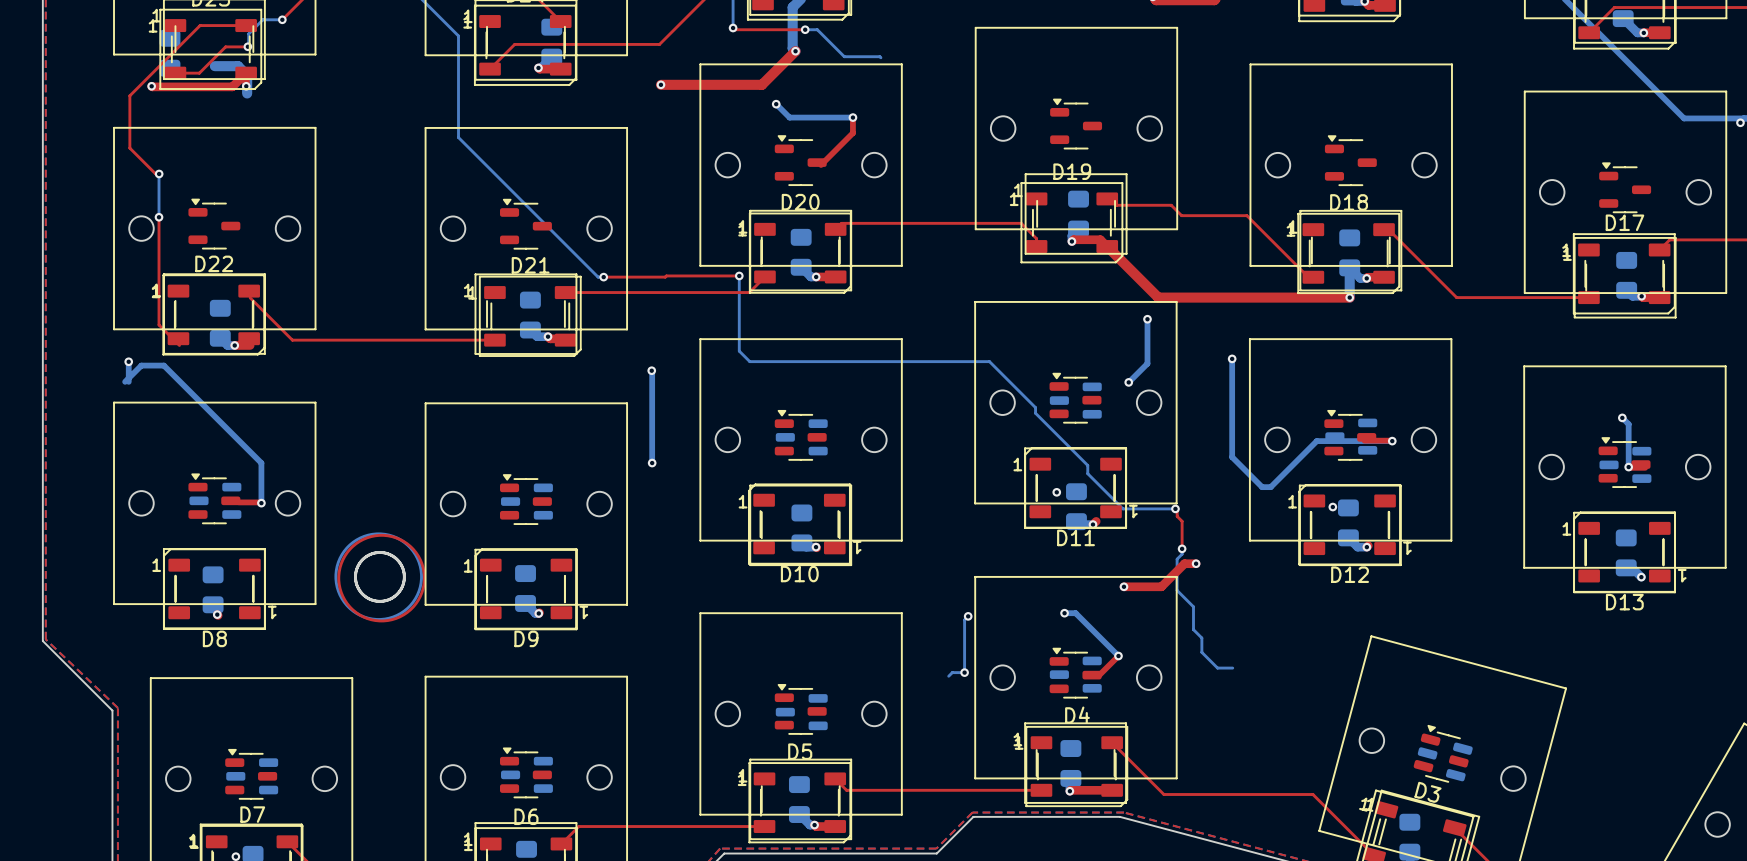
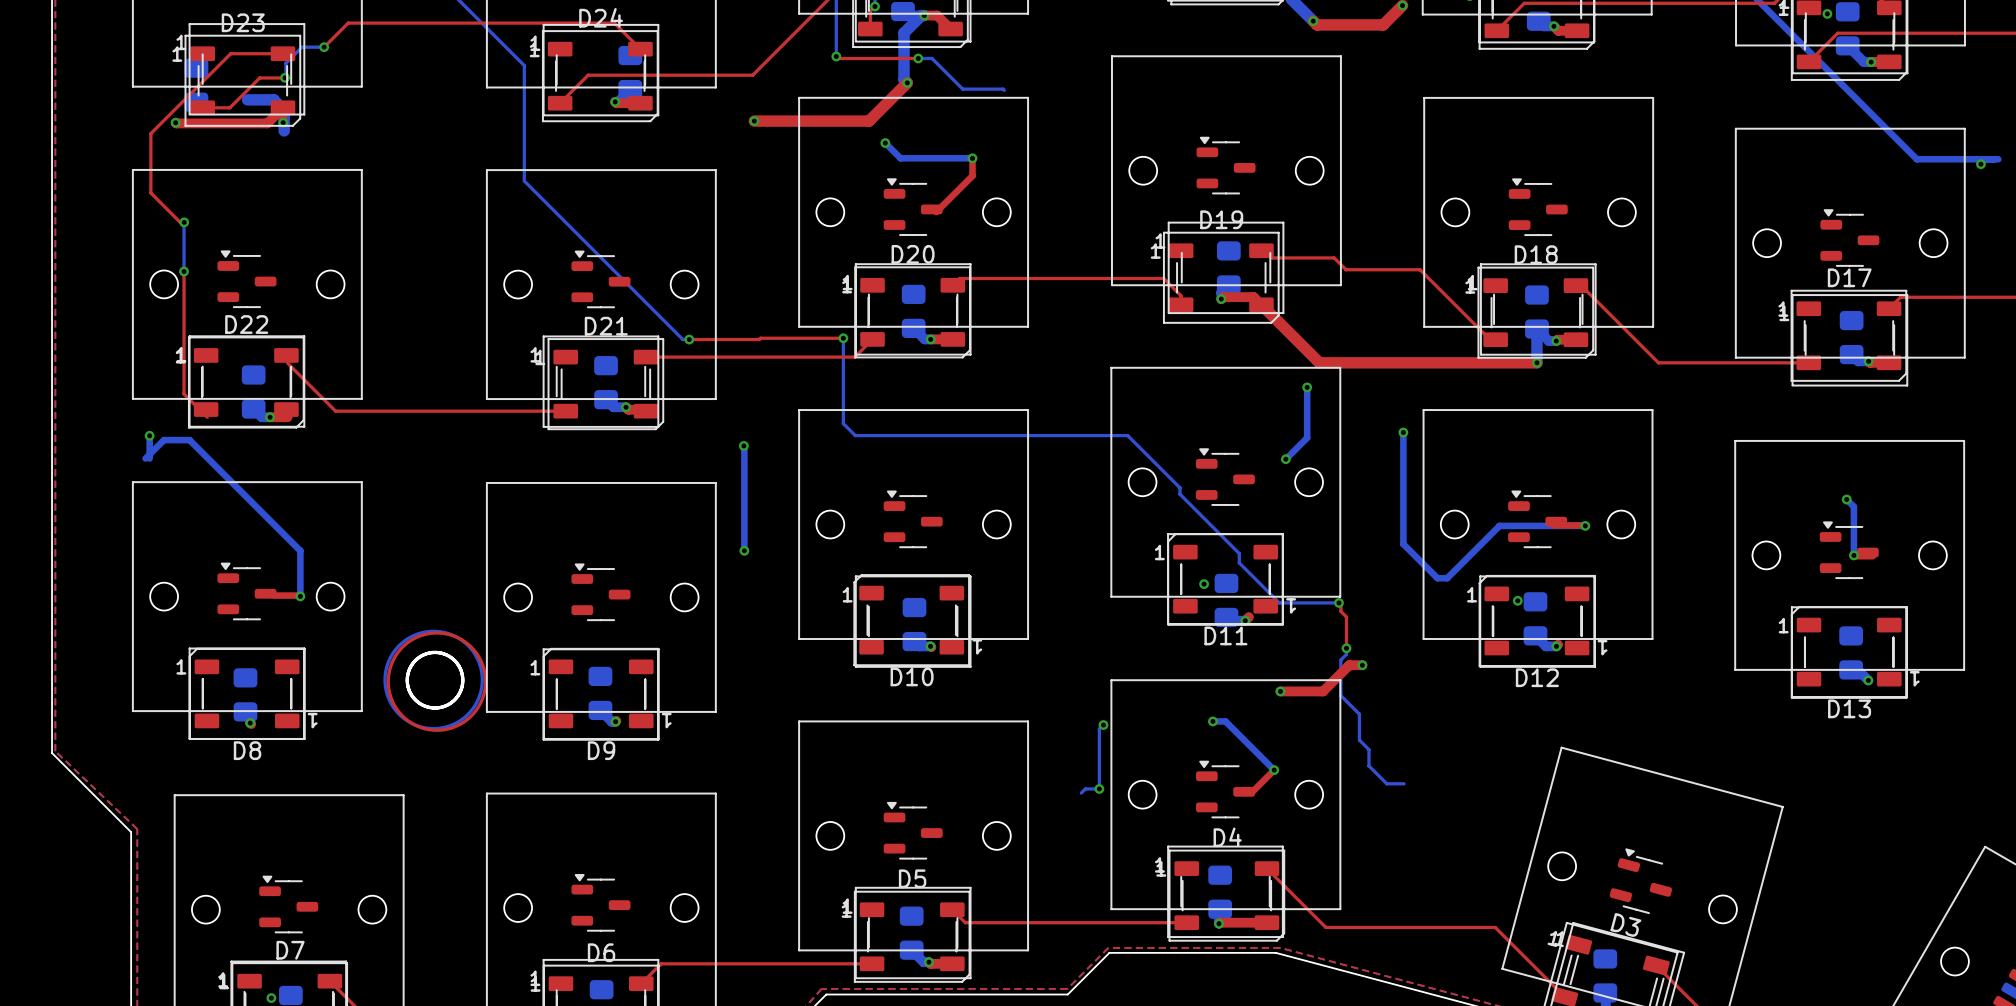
part: (1075, 400) -> none
part: (1351, 436) -> none
part: (801, 437) -> none
part: (1625, 464) -> none
part: (215, 500) -> none
part: (526, 501) -> none
part: (1075, 674) -> none
part: (801, 712) -> none
part: (1445, 761) -> none
part: (526, 774) -> none
part: (252, 776) -> none

